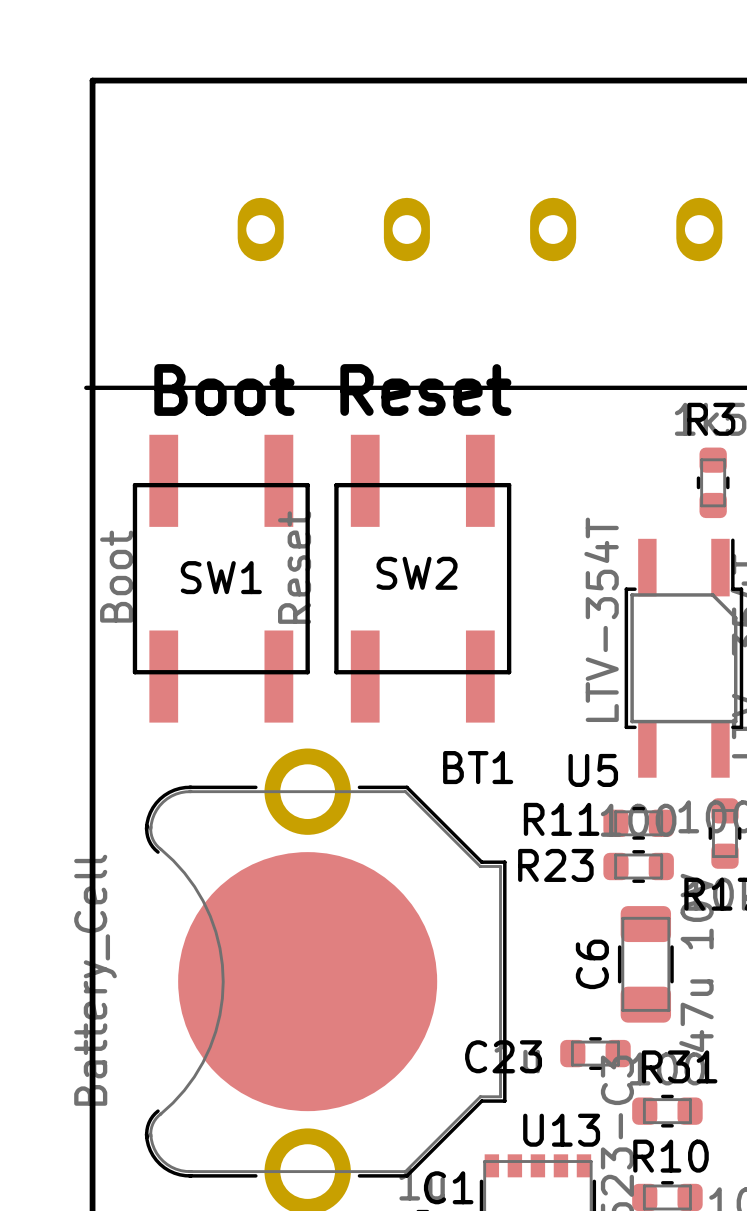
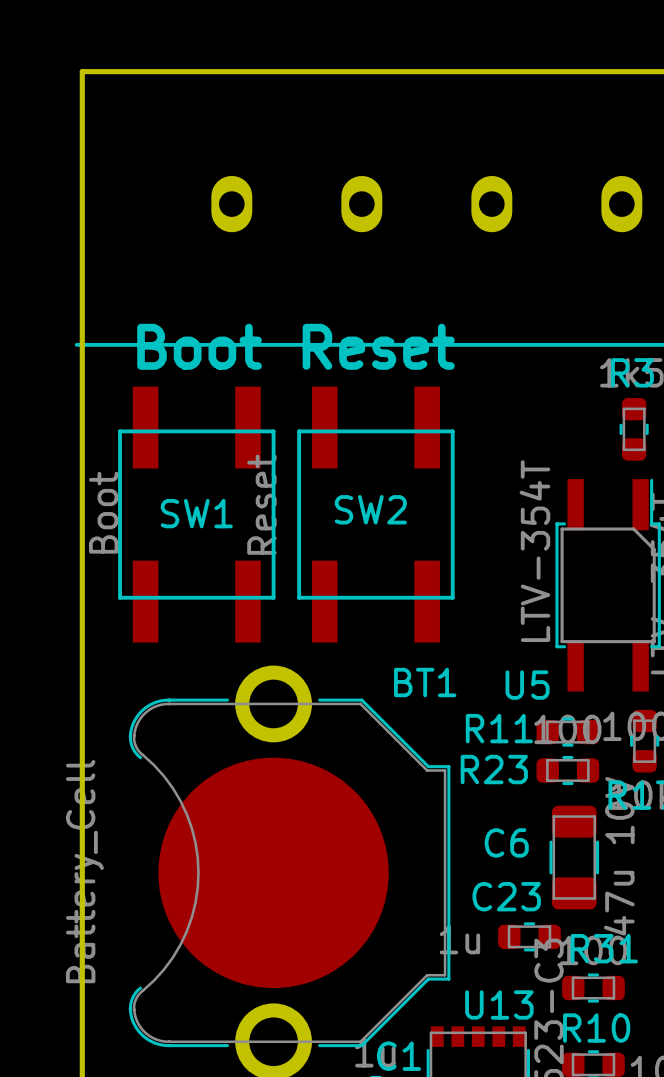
C6 name rotation: 0° (592, 964) -> 90° clockwise (506, 842)
C23 name position: C23 (503, 1056) -> C23 (506, 896)

